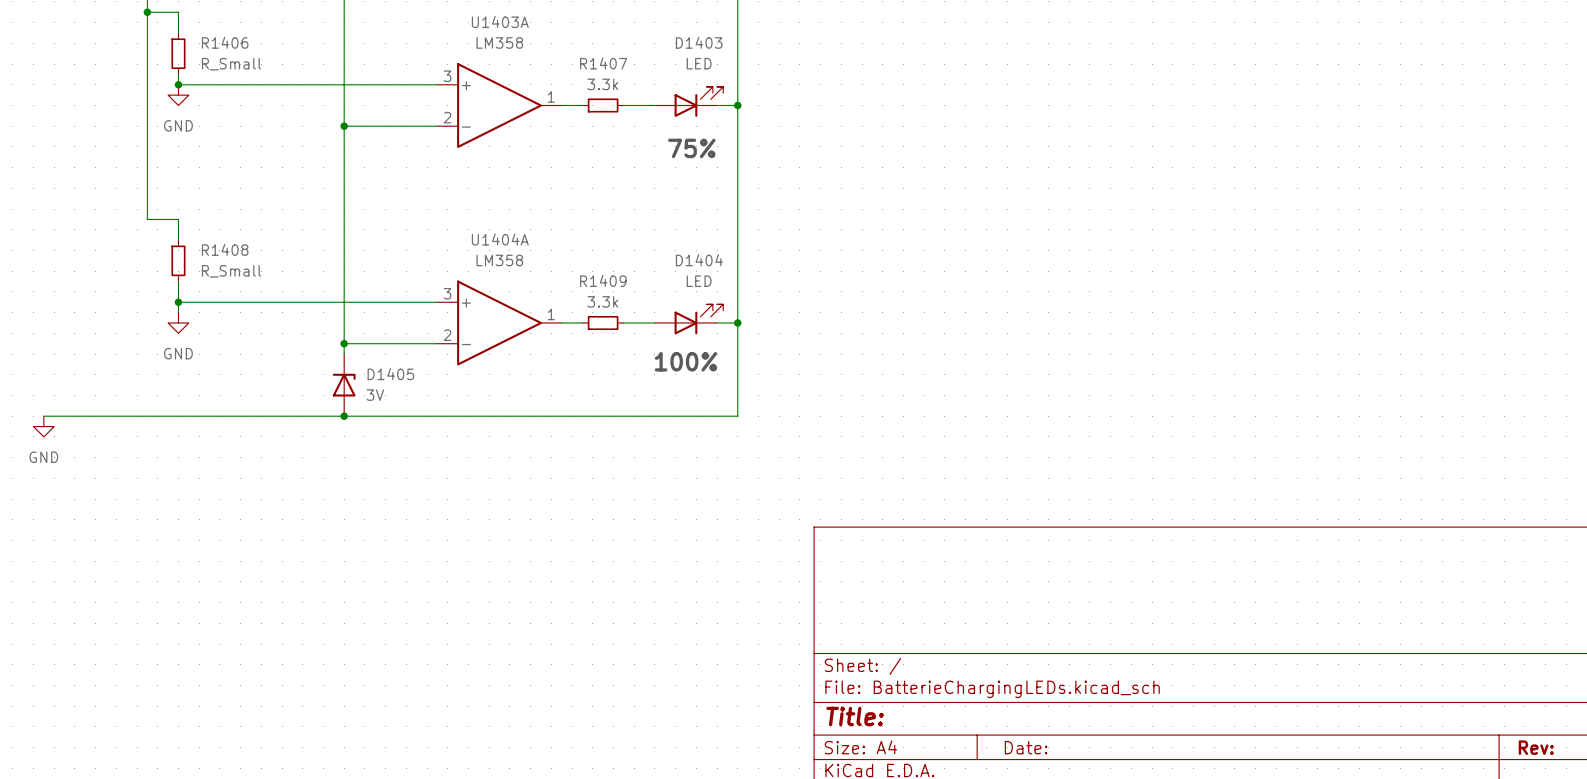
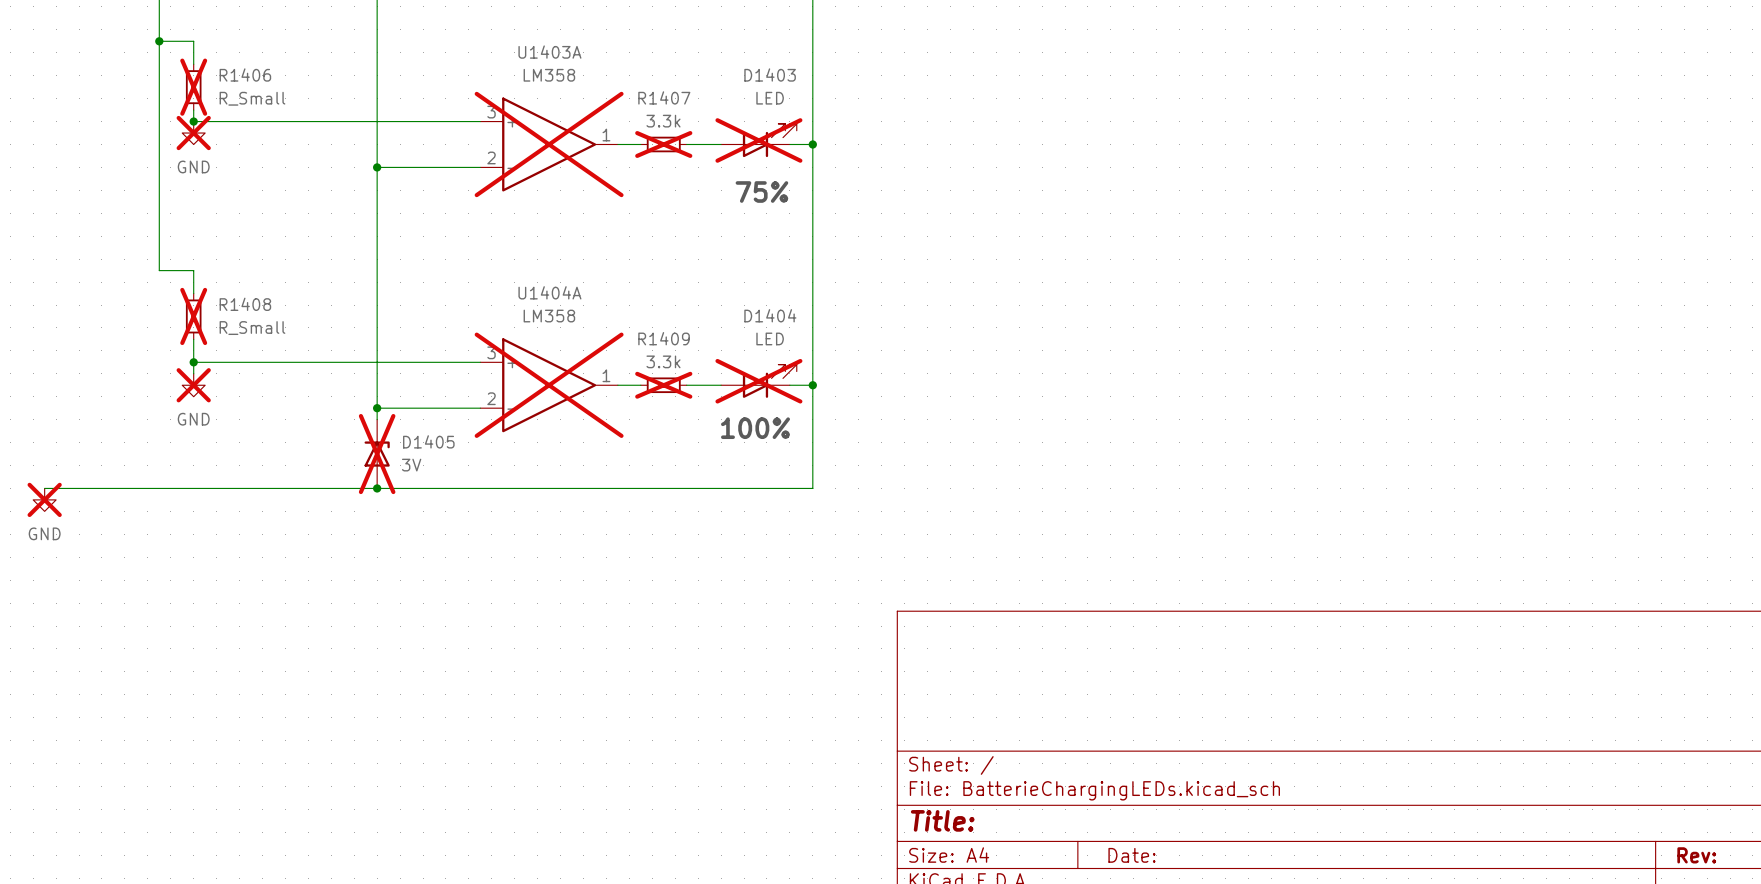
R1406 do-not-place cross: none -> (193, 87)
power symbol do-not-place cross: none -> (193, 133)
D1403 do-not-place cross: none -> (758, 140)
U1403A do-not-place cross: none -> (549, 144)
R1407 do-not-place cross: none -> (663, 144)
R1408 do-not-place cross: none -> (193, 316)
D1404 do-not-place cross: none -> (758, 381)
power symbol do-not-place cross: none -> (193, 385)
U1404A do-not-place cross: none -> (549, 385)
R1409 do-not-place cross: none -> (663, 385)
D1405 do-not-place cross: none -> (377, 454)
power symbol do-not-place cross: none -> (44, 499)

